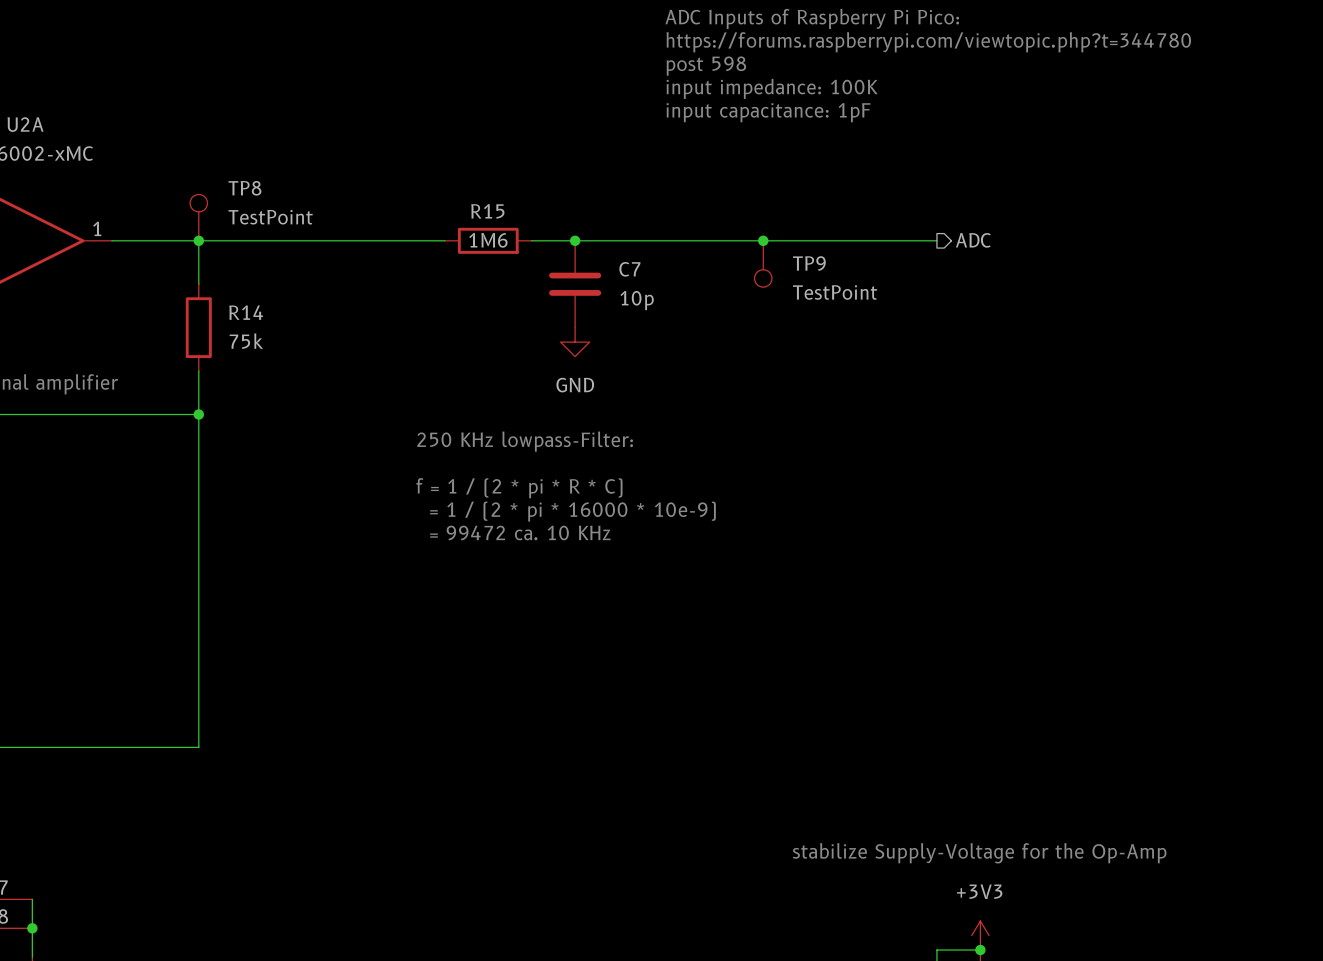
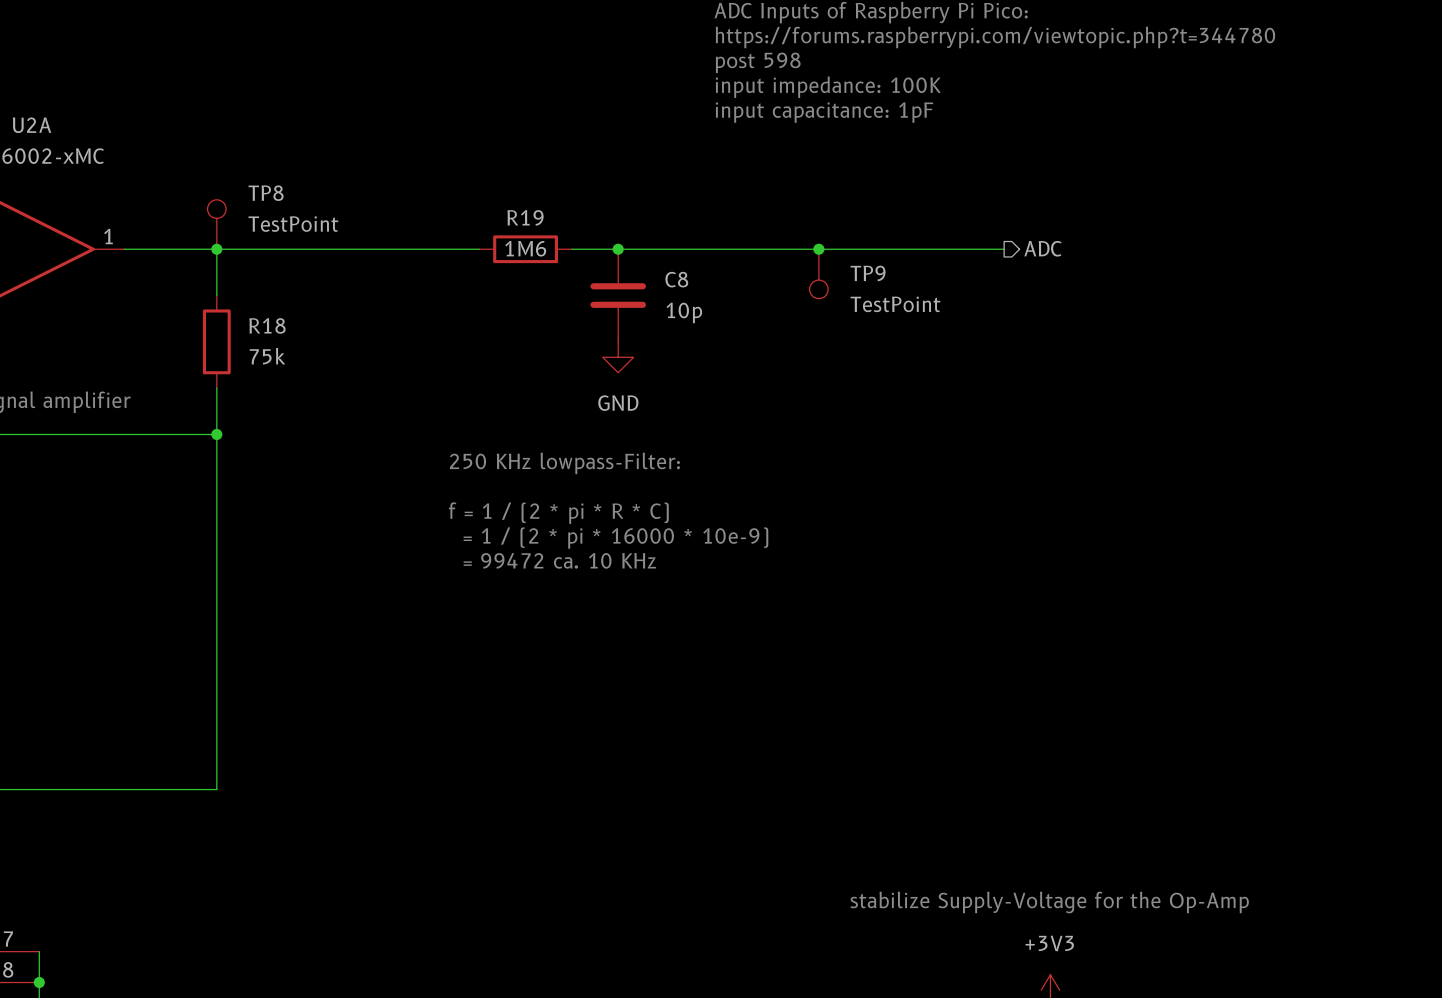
R15 name: R15 (487, 211) -> R19 (525, 217)
C7 name: C7 (629, 269) -> C8 (676, 279)
R14 name: R14 (246, 312) -> R18 (267, 325)

